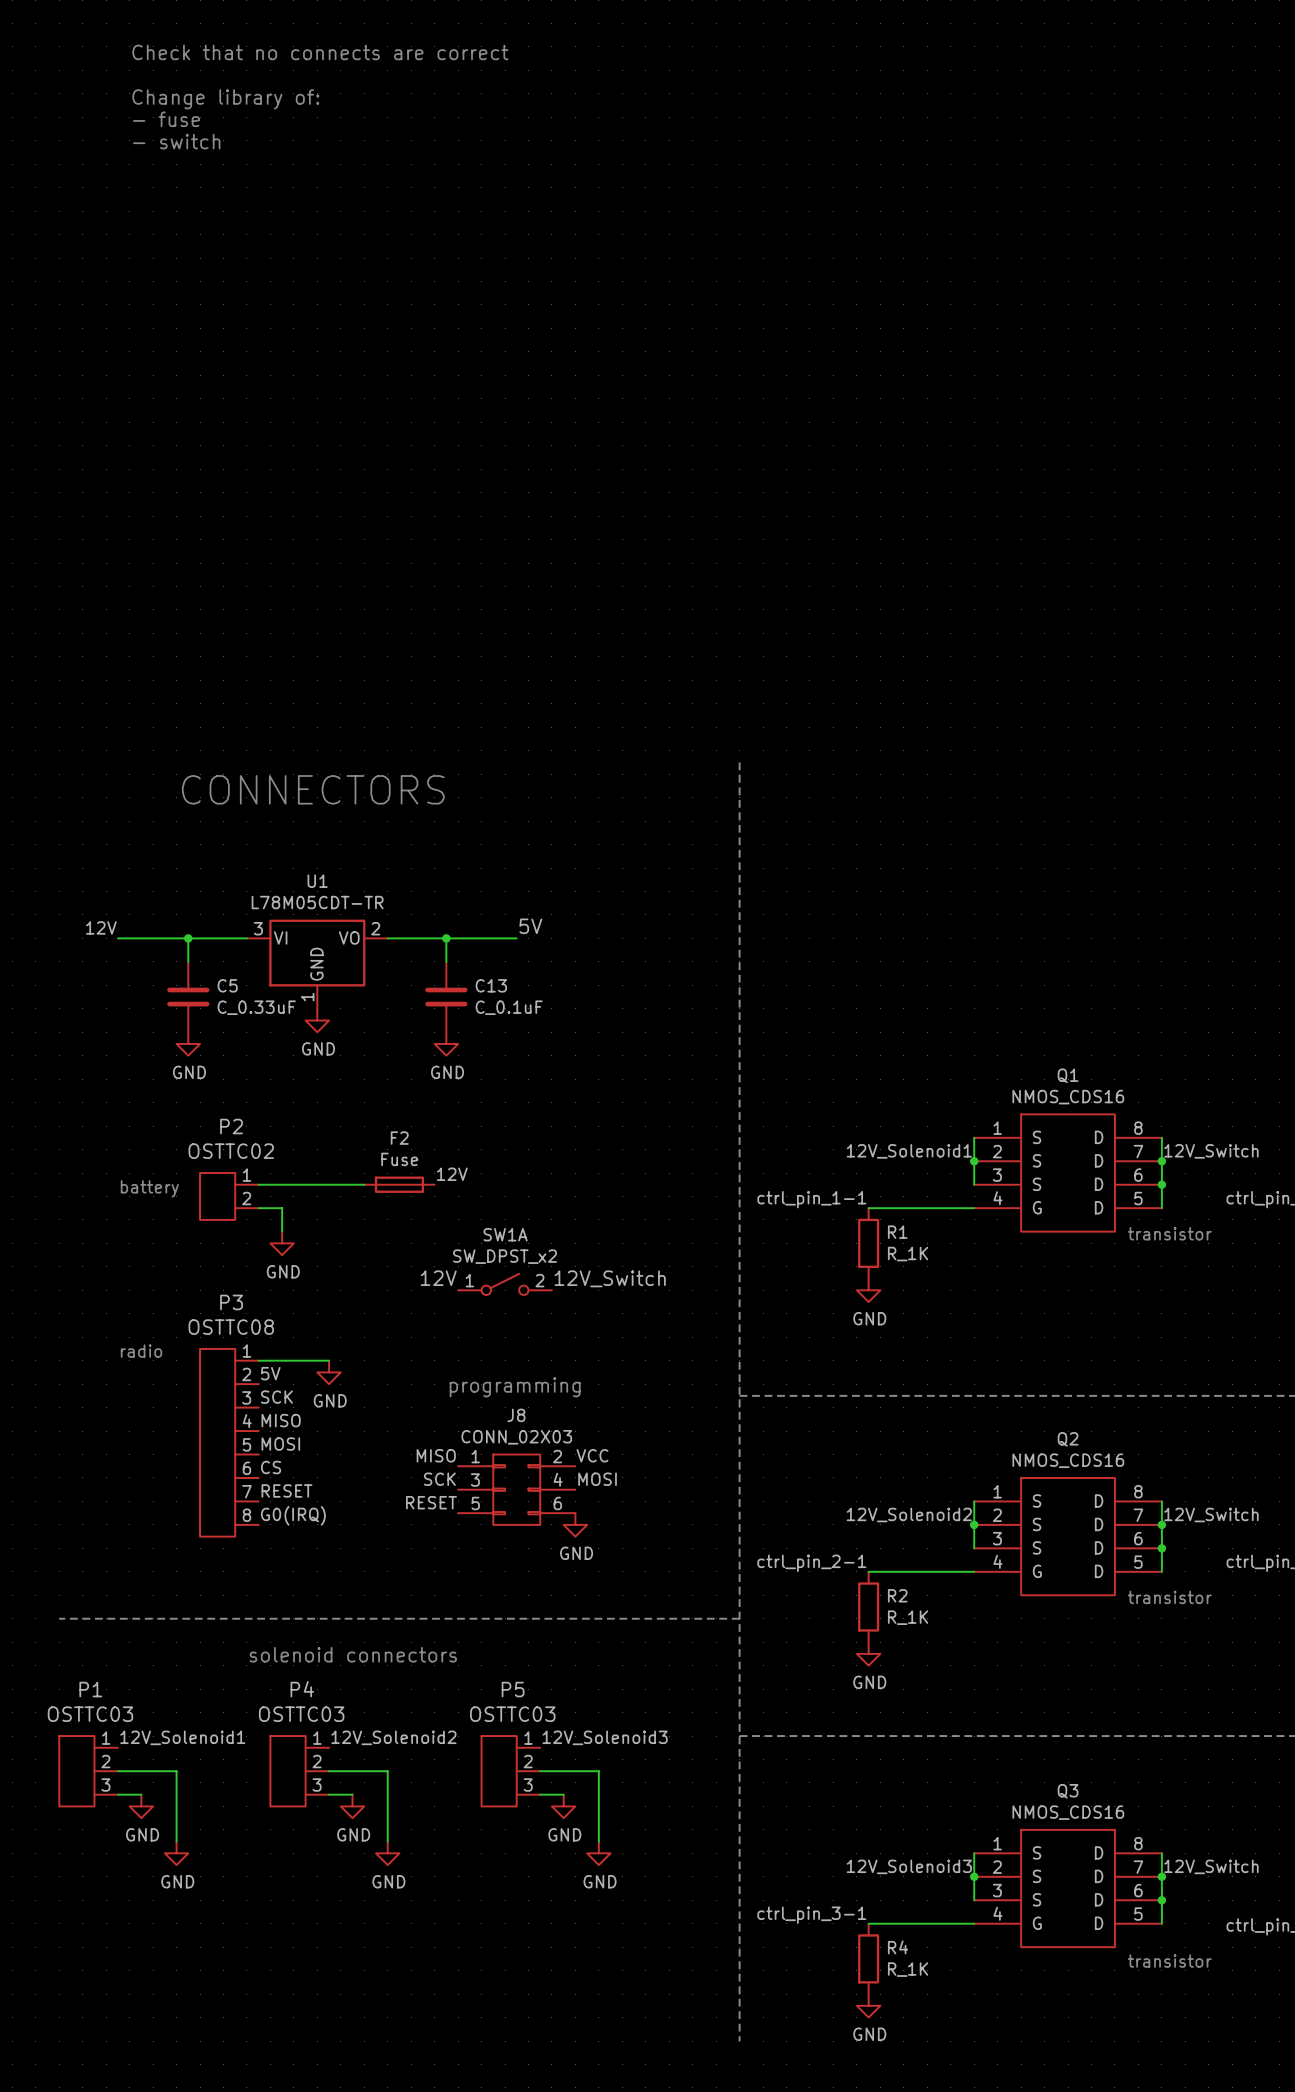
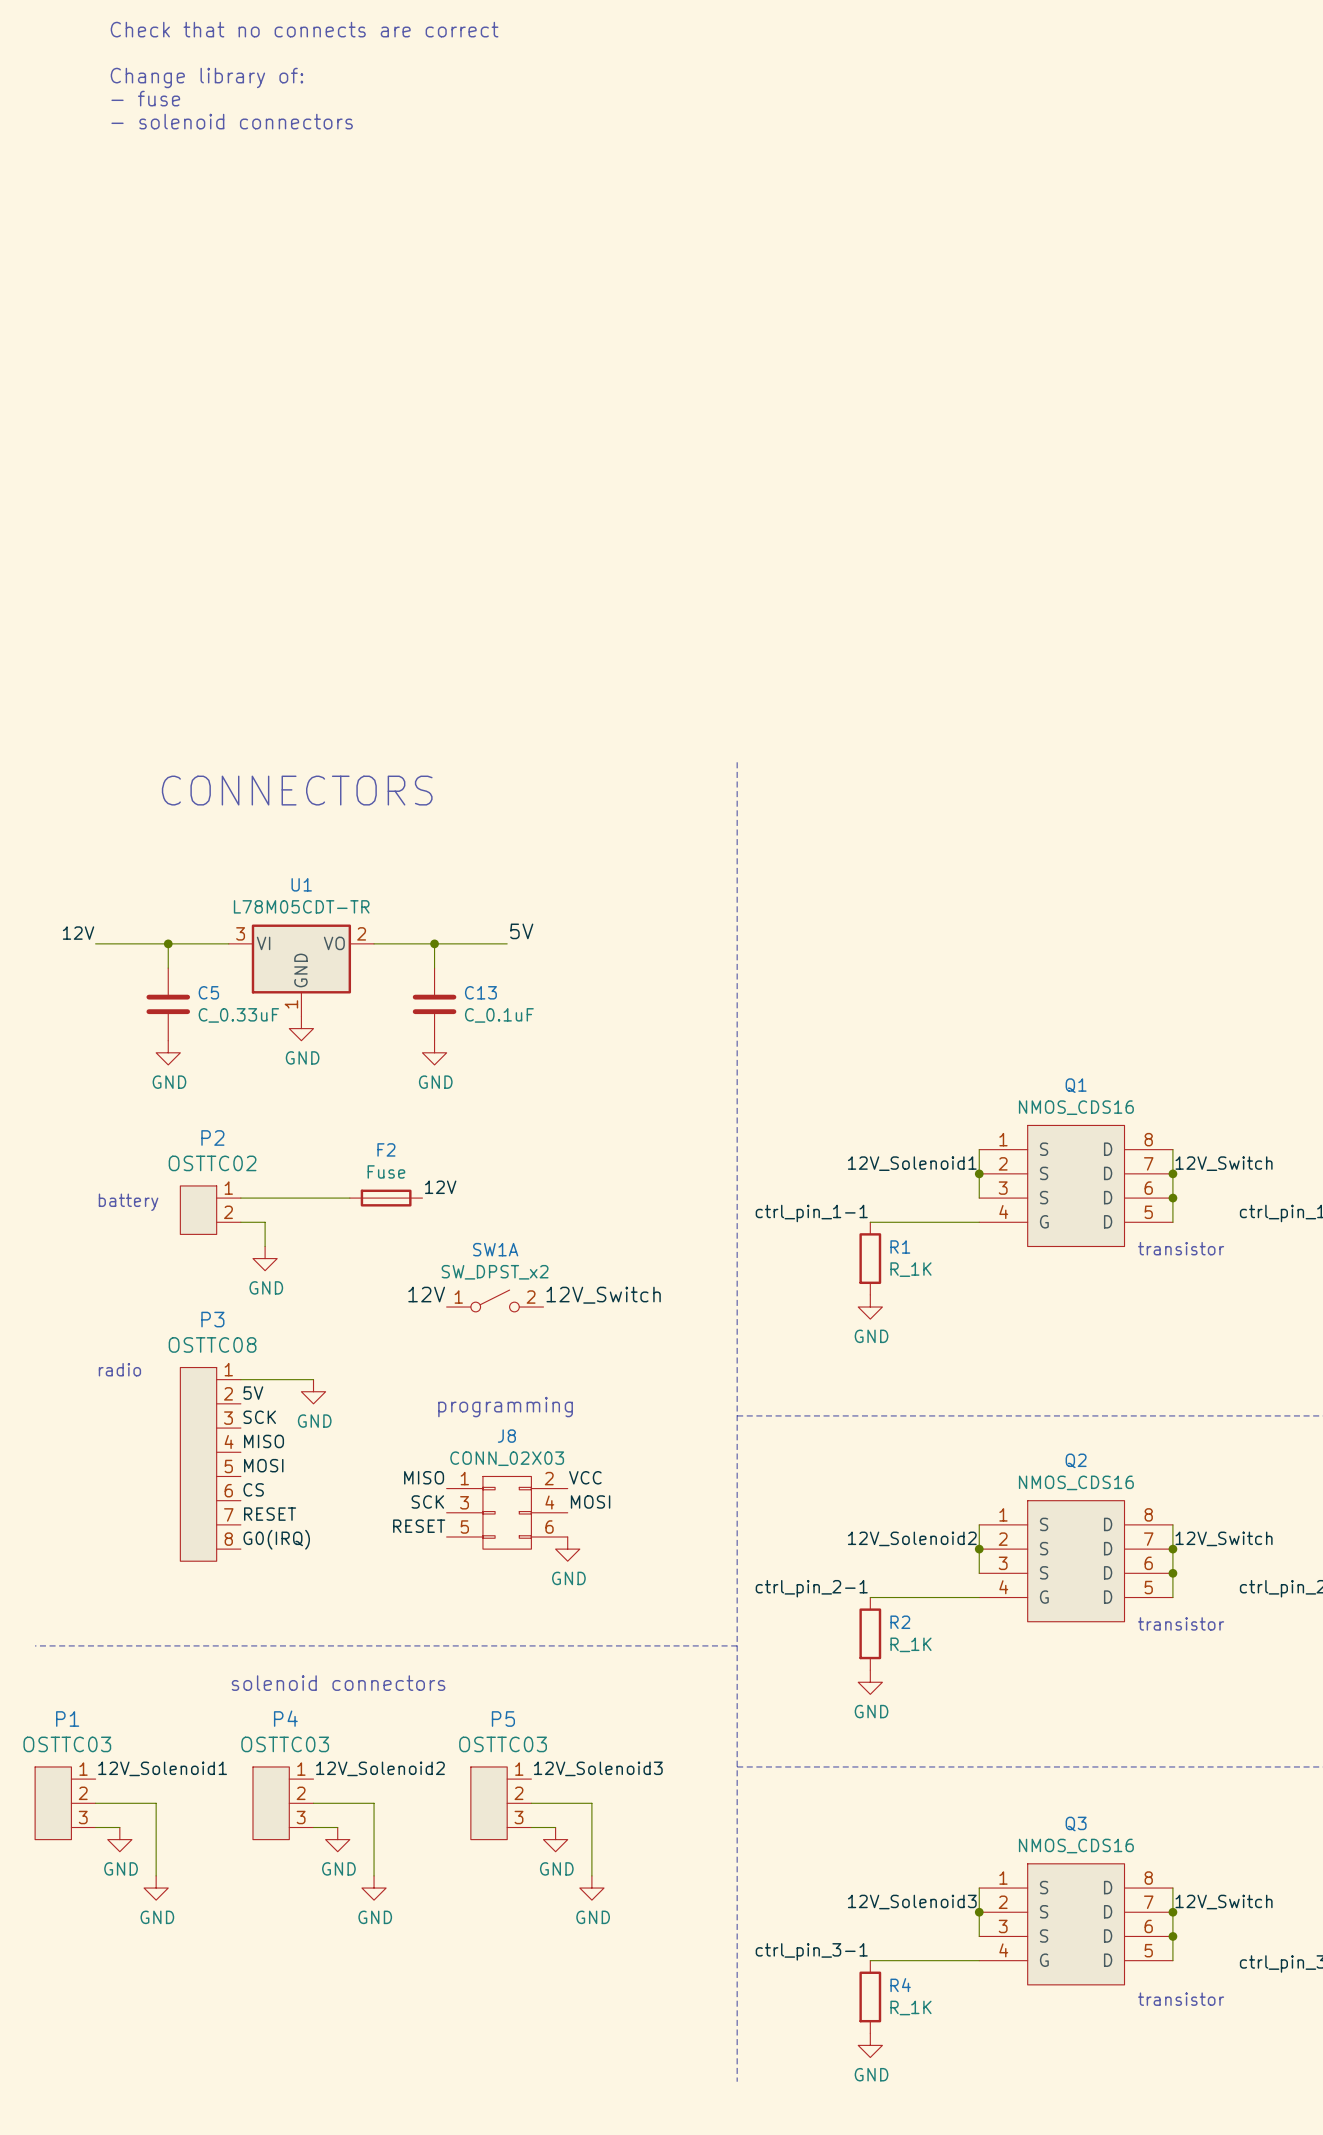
text: - switch (176, 141) -> - solenoid connectors (232, 121)

